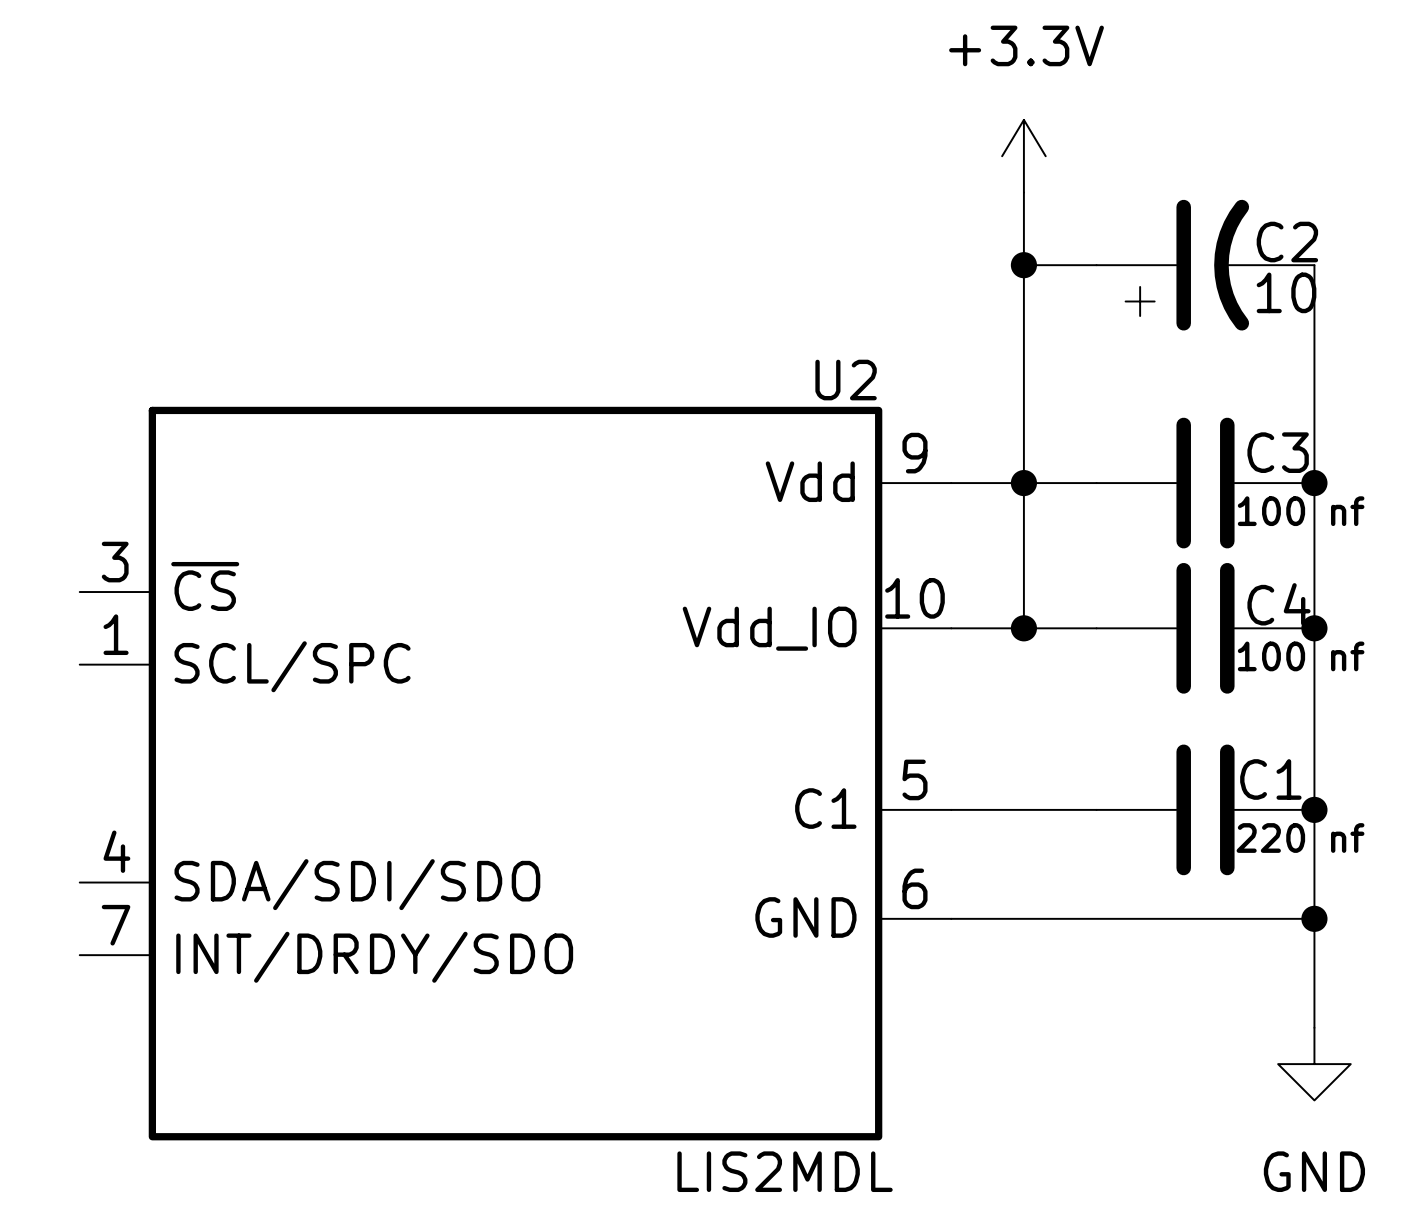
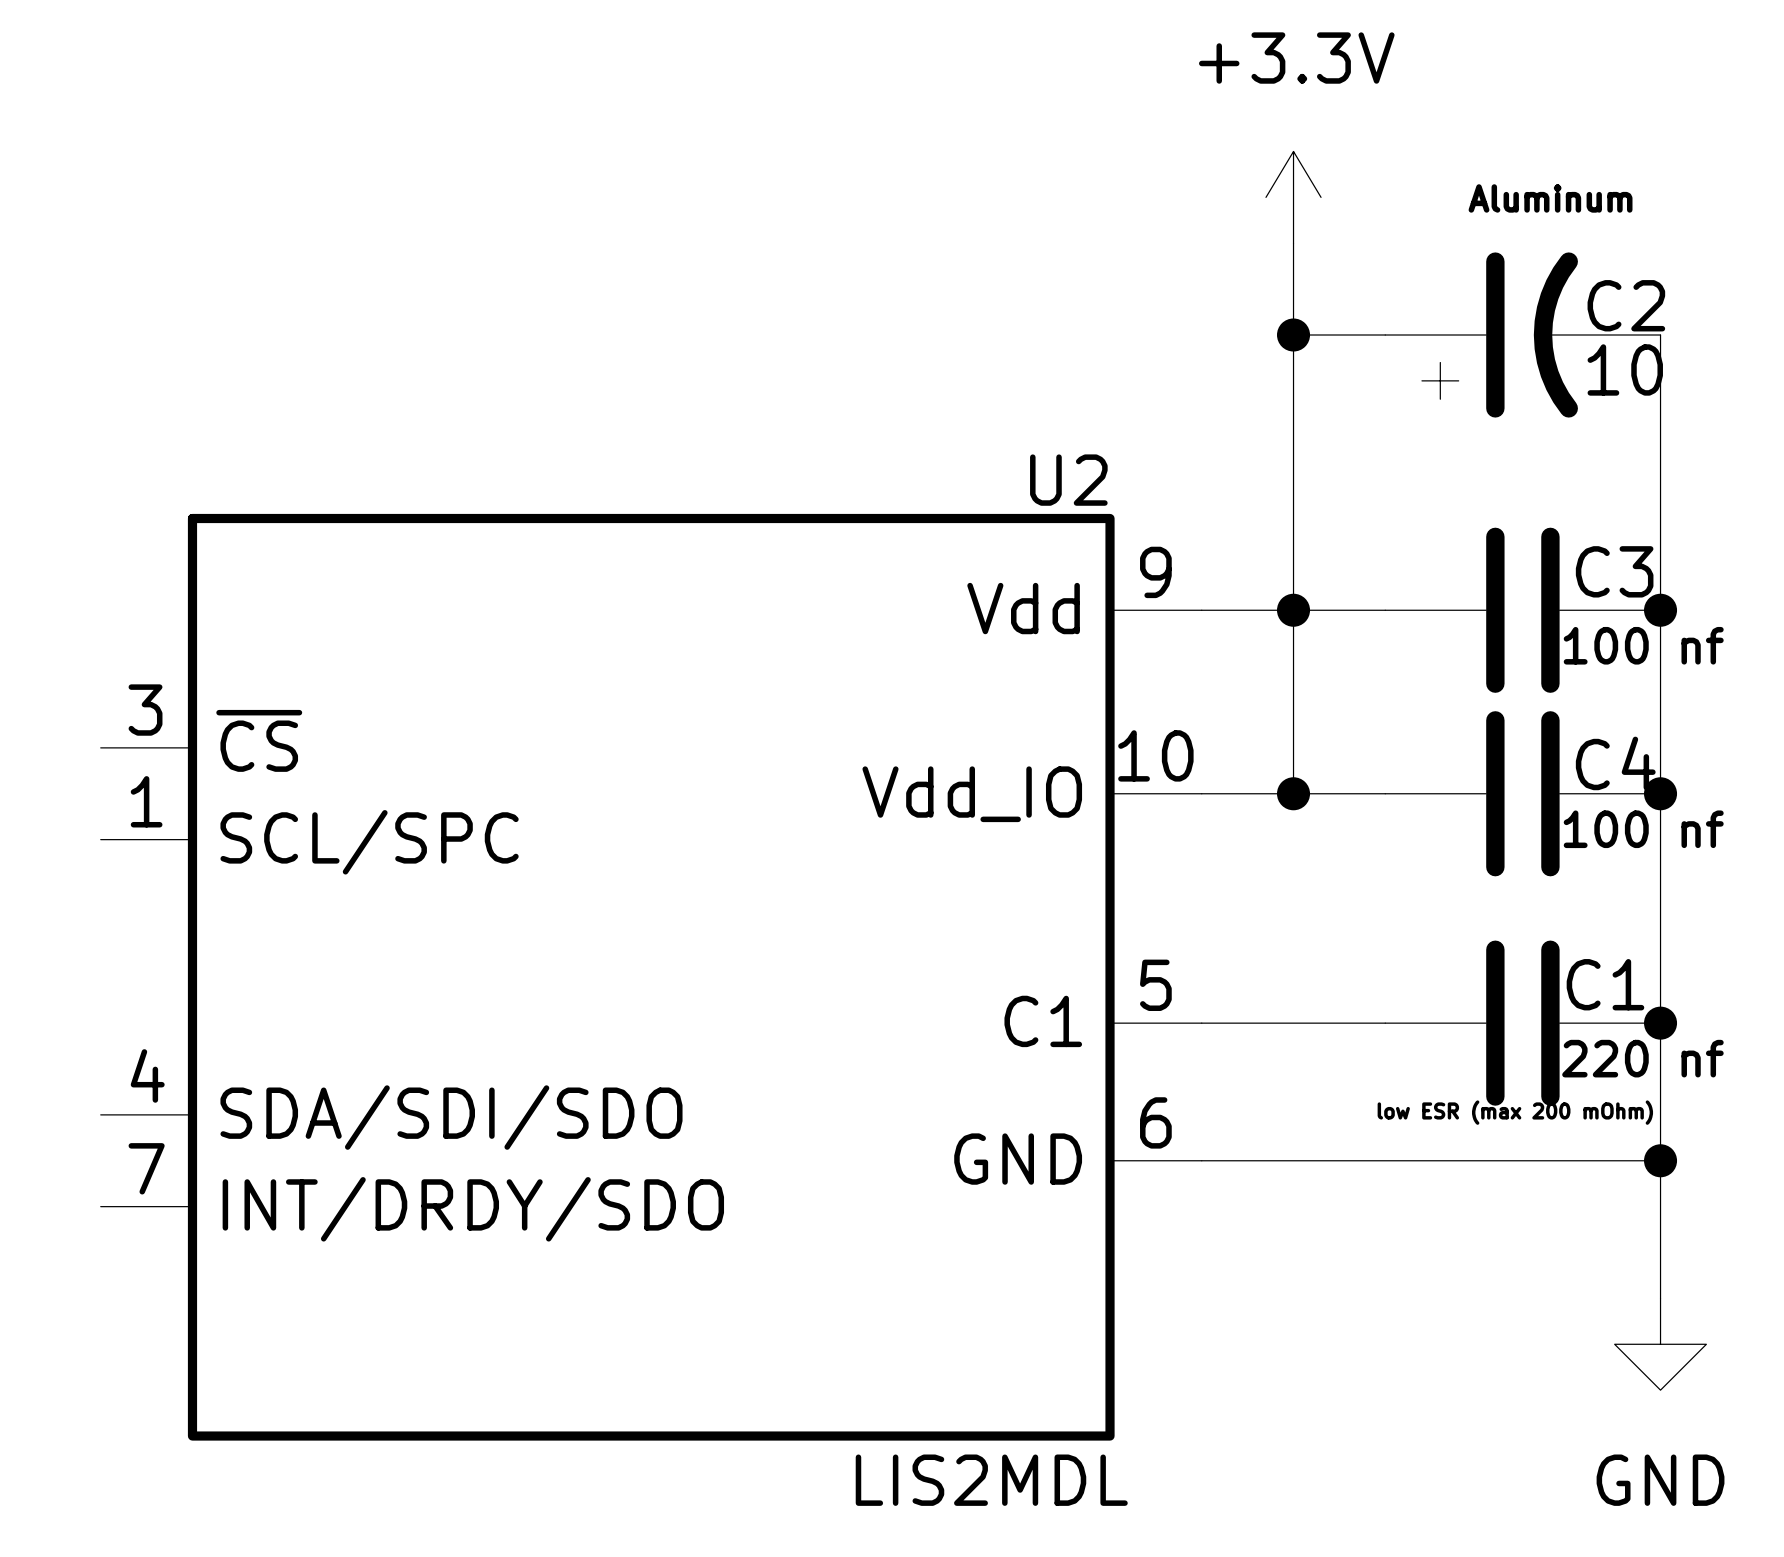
text: none -> Aluminum (1550, 198)
text: none -> low ESR (max 200 mOhm) (1515, 1112)

